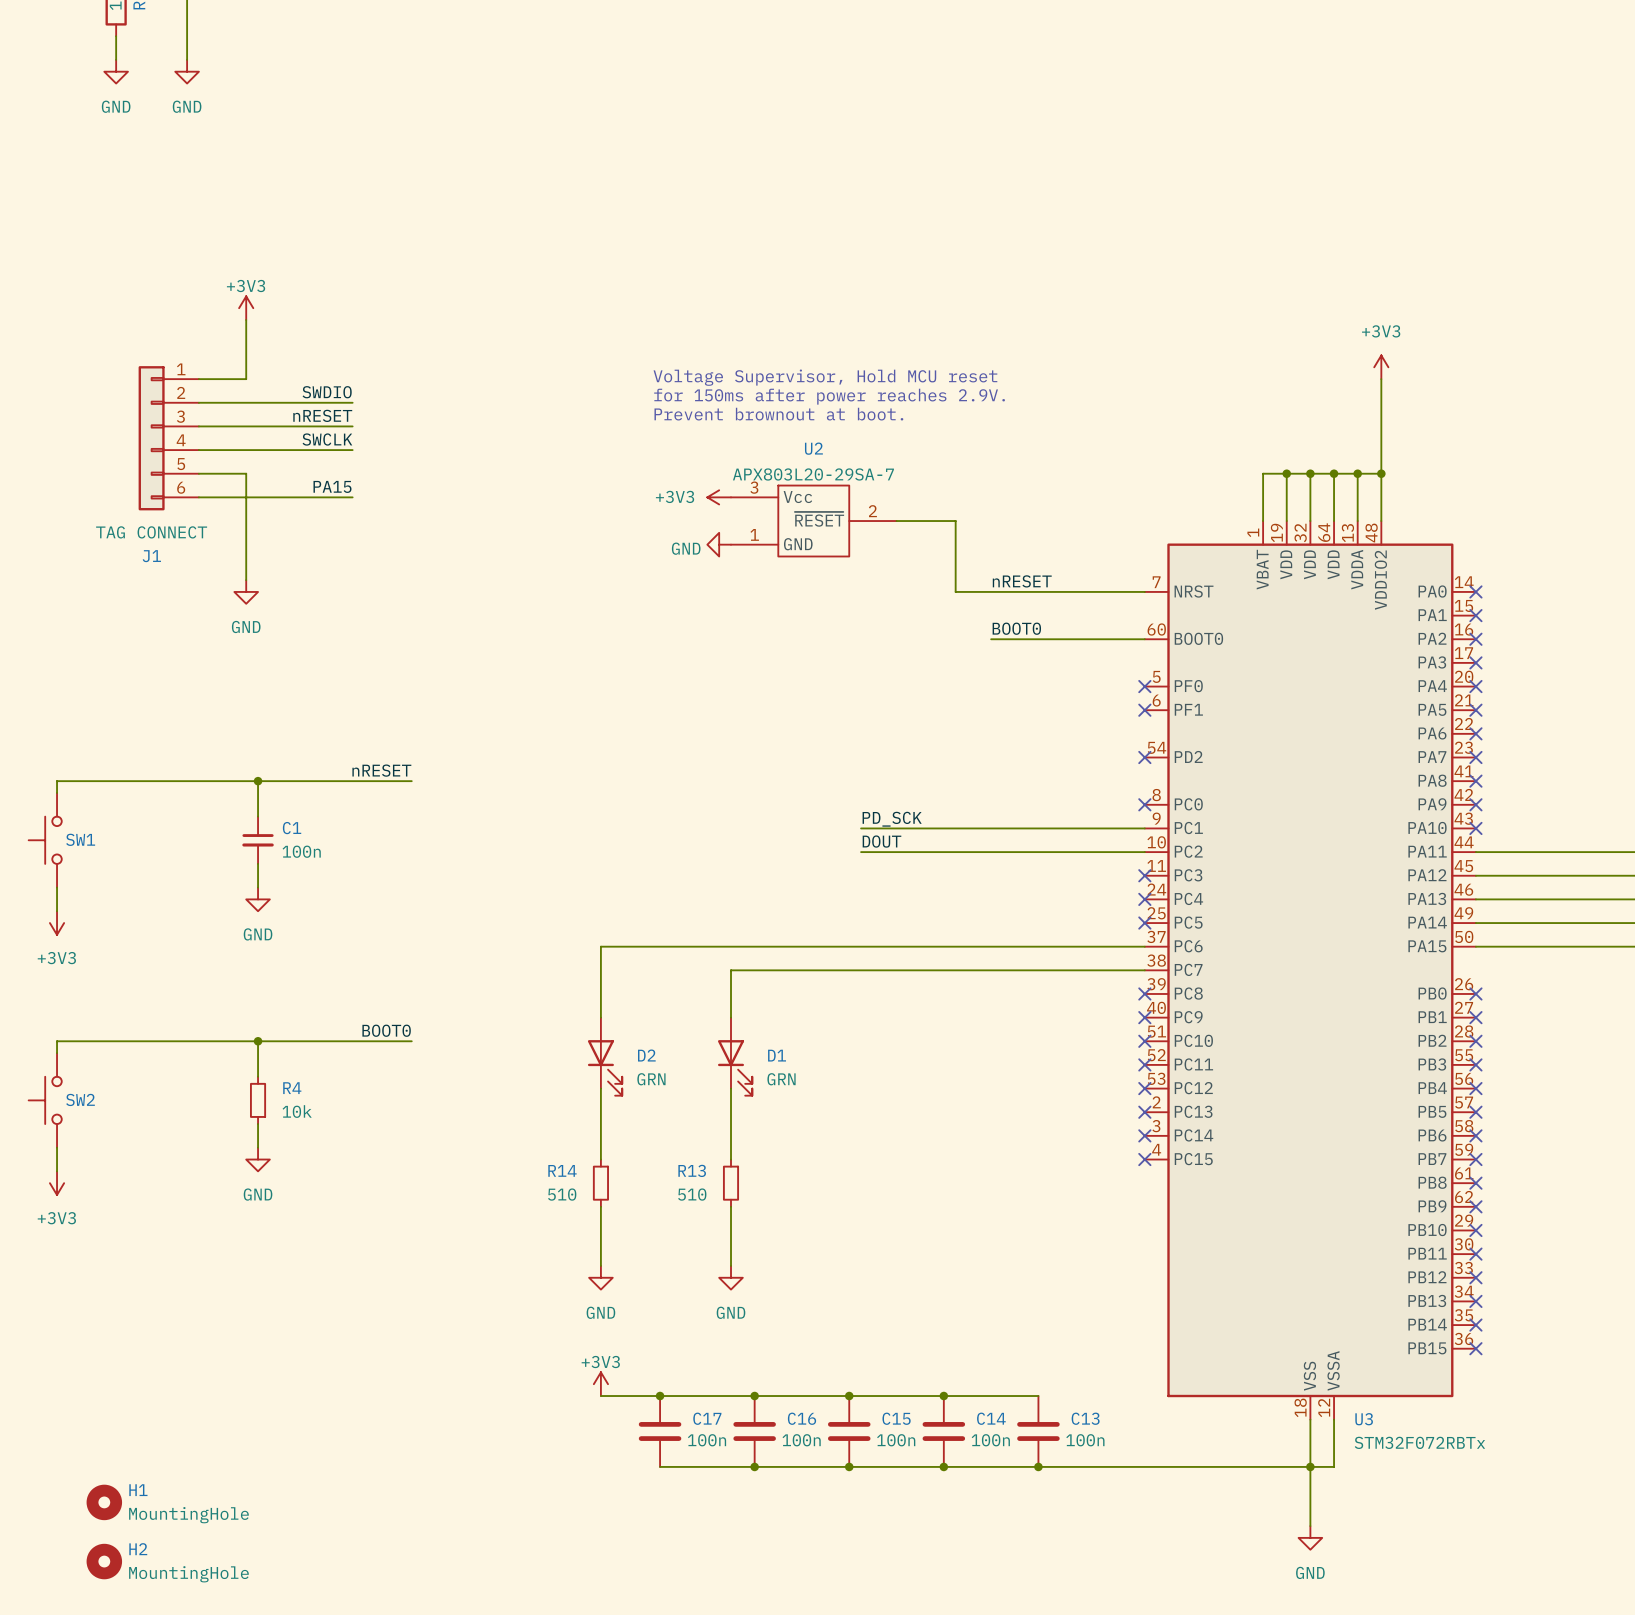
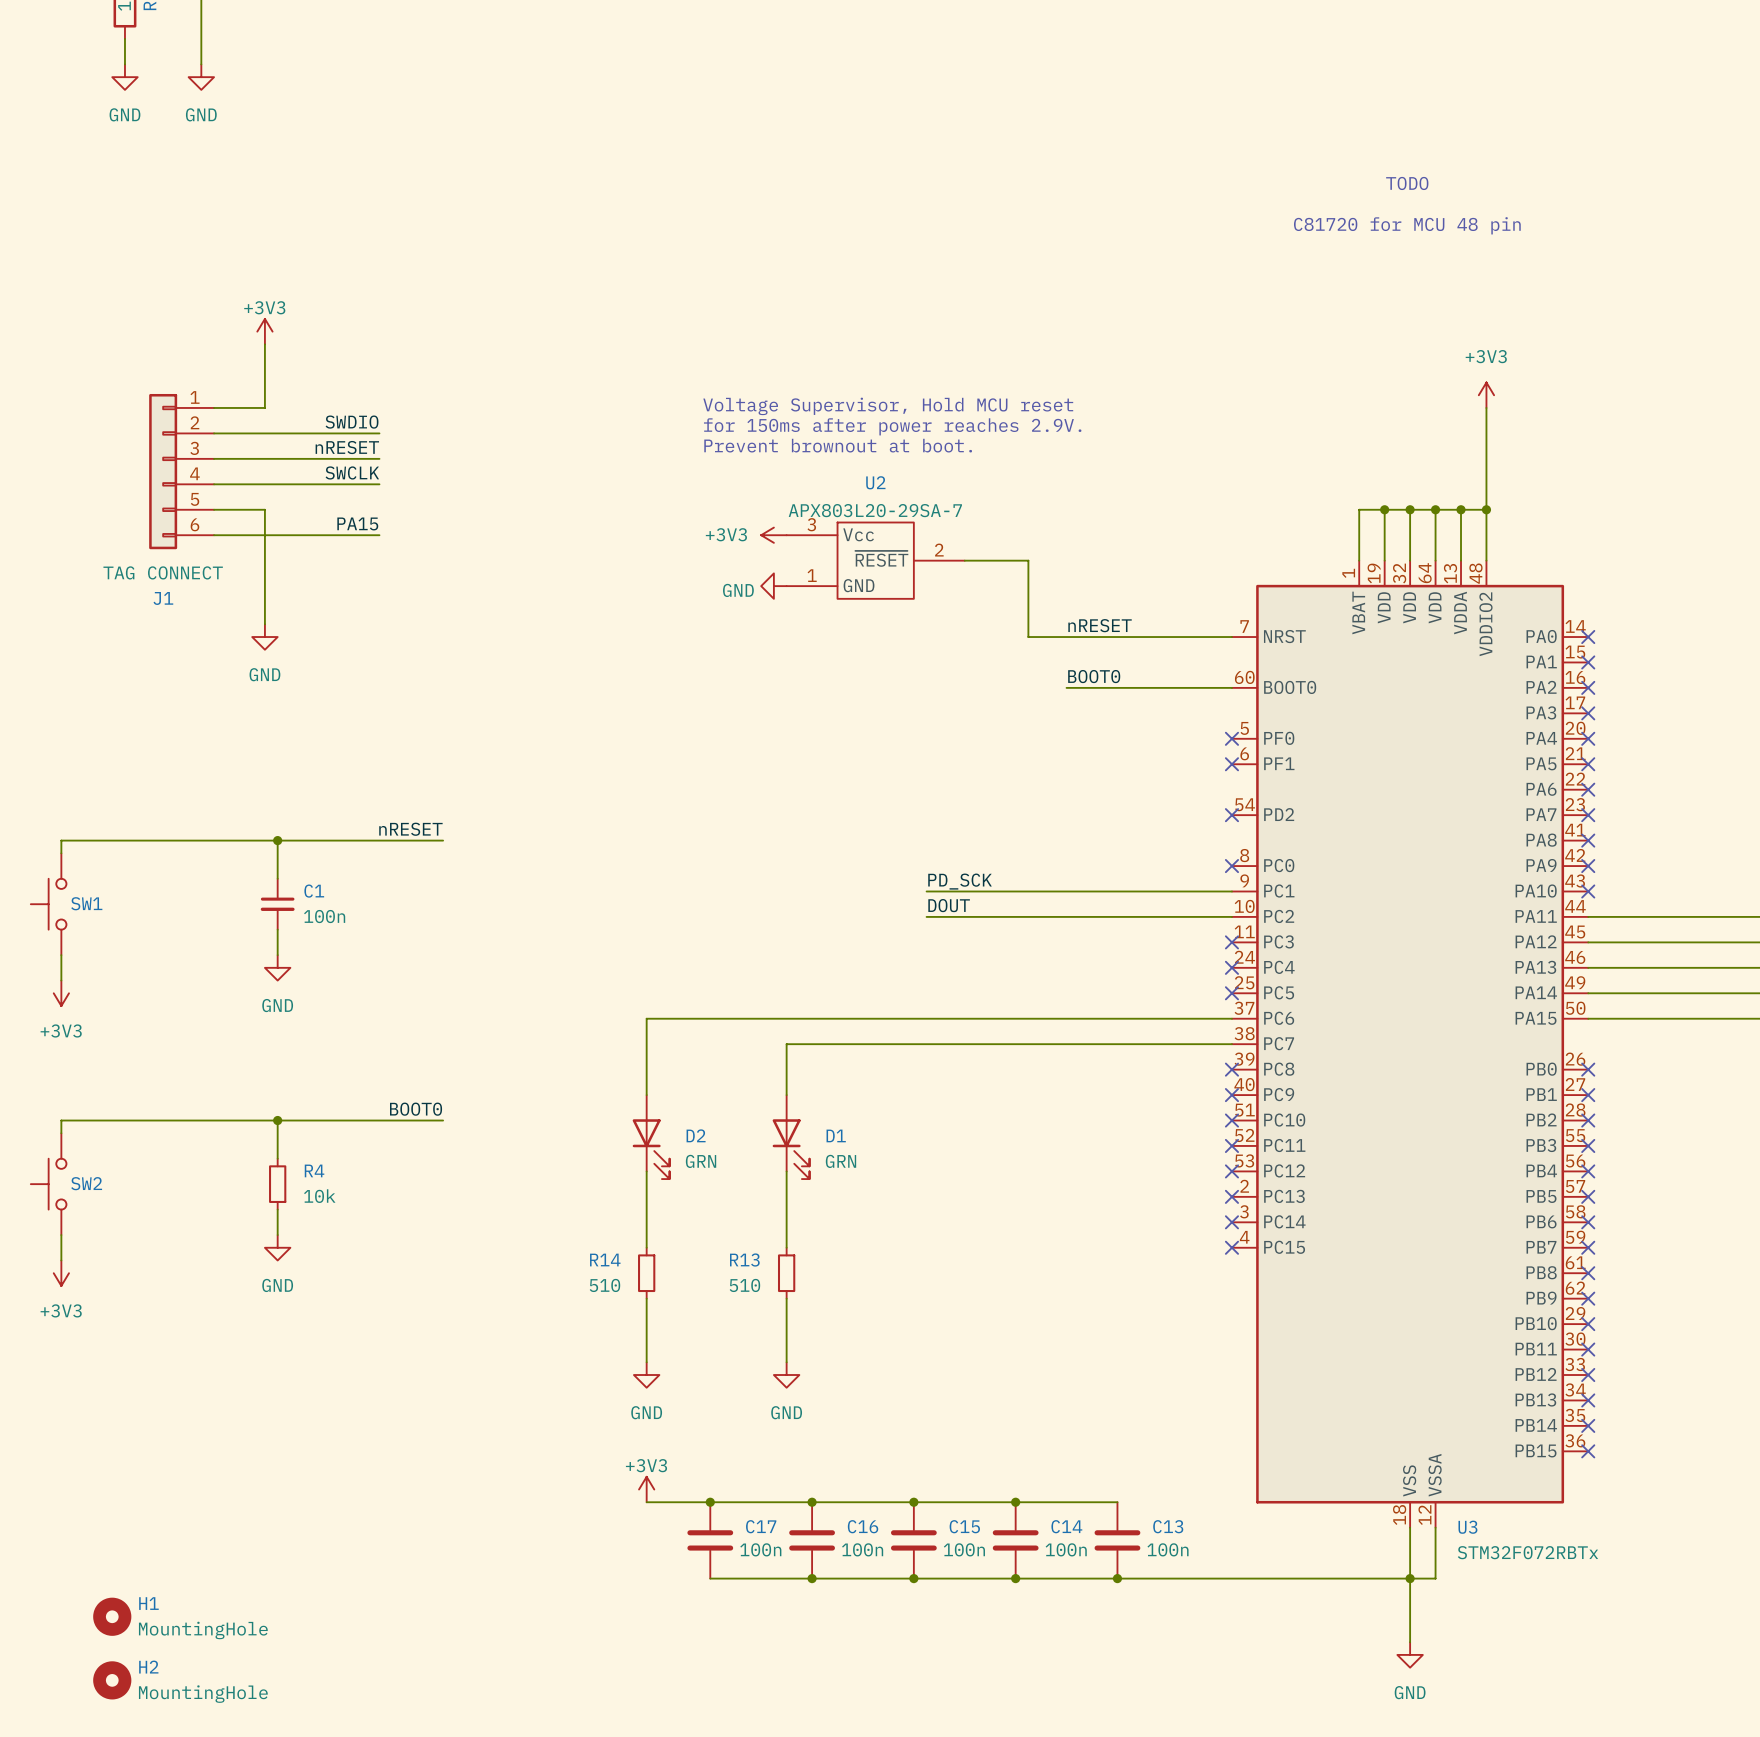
text: none -> TODO (1407, 183)
text: none -> C81720 for MCU 48 pin (1407, 225)

